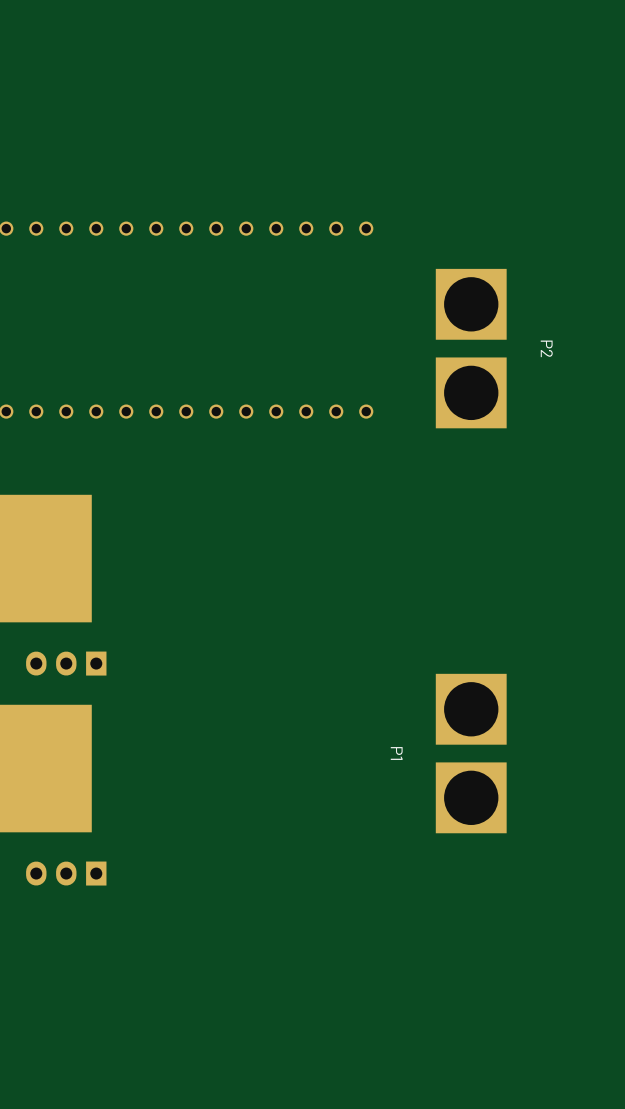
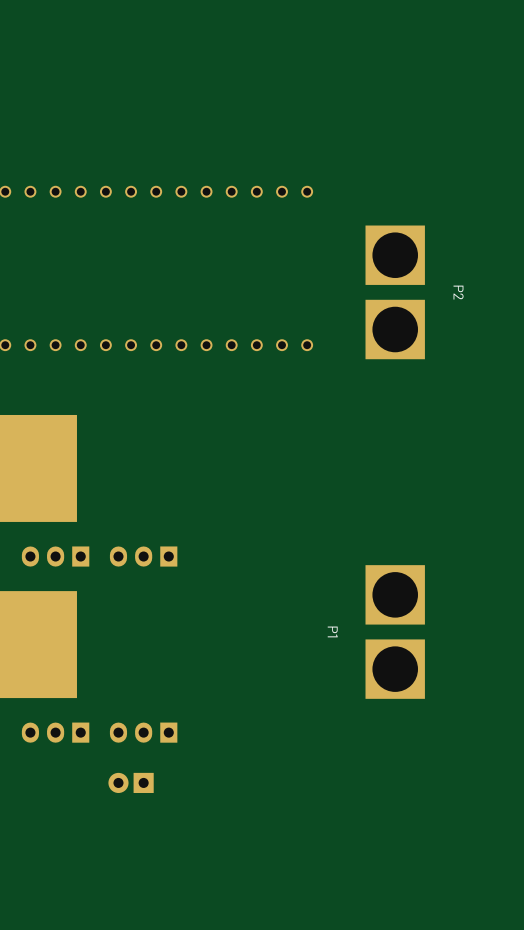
part: none -> (143, 556)
part: none -> (143, 732)
part: none -> (131, 782)

